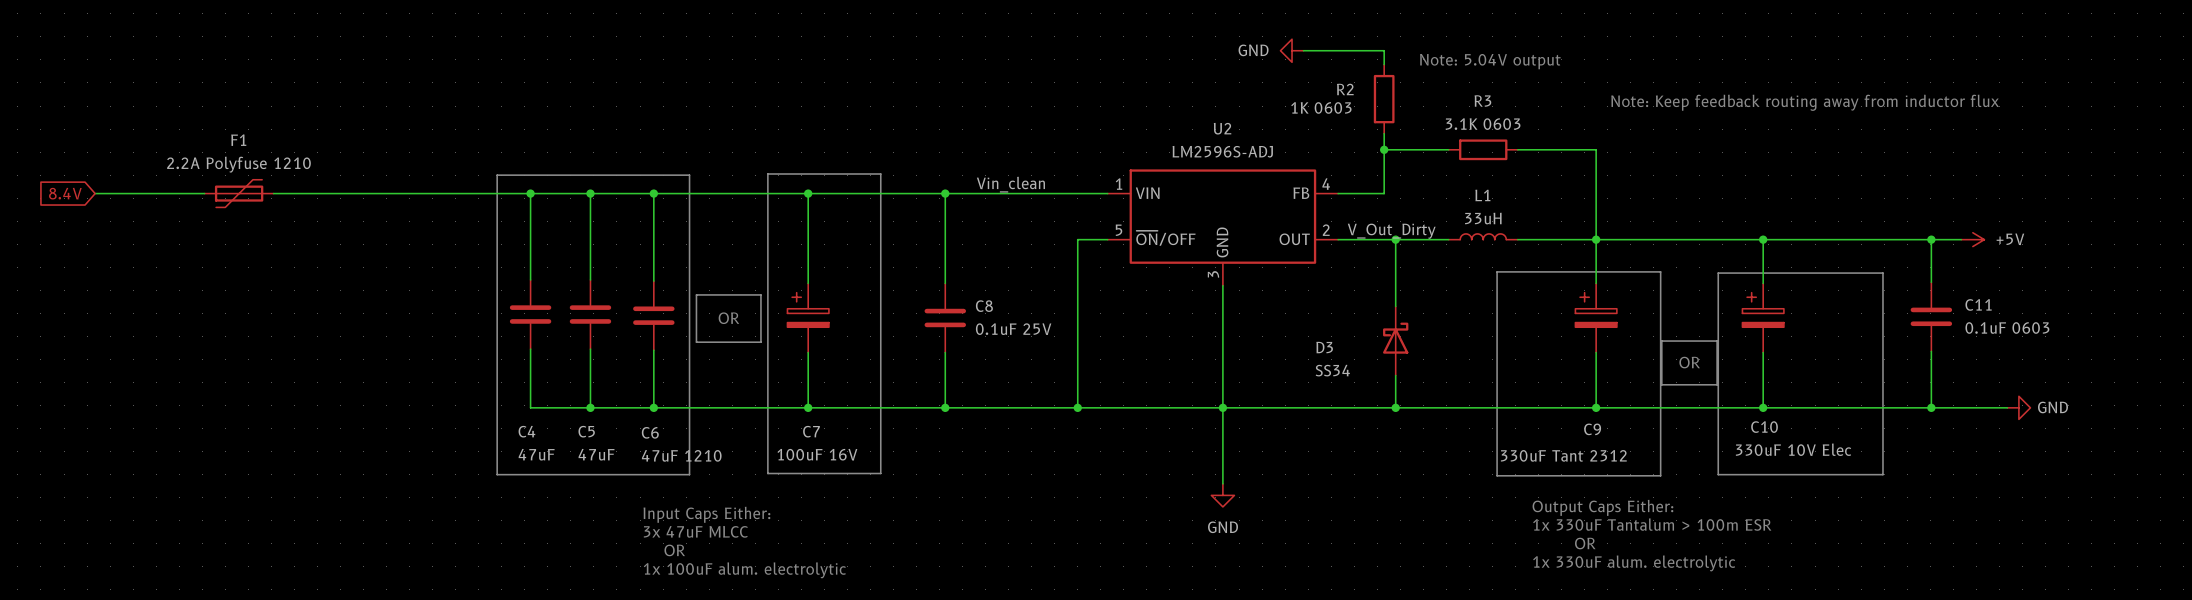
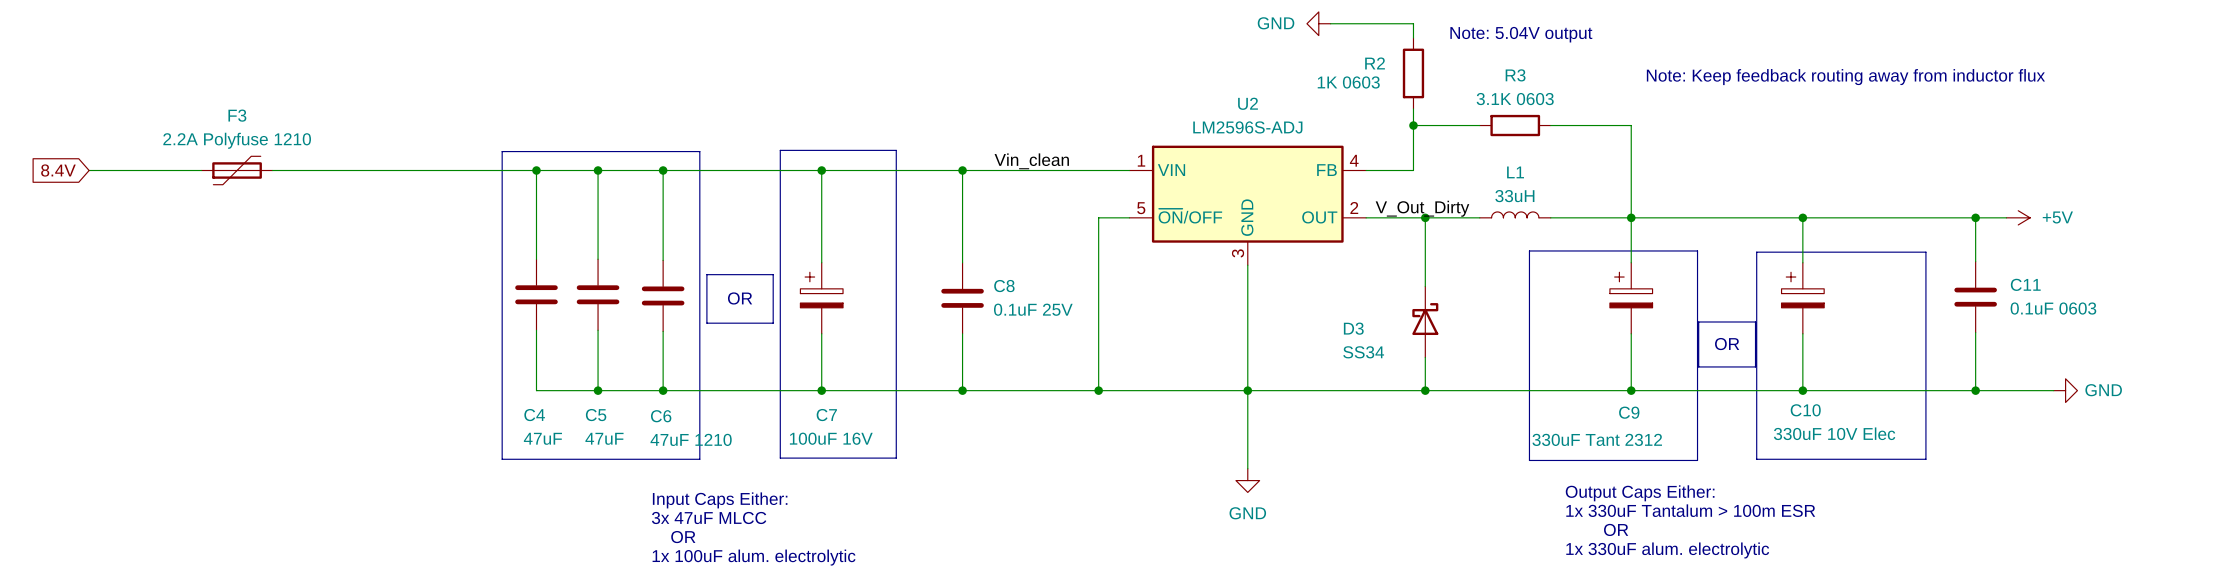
F1 name: F1 (238, 140) -> F3 (237, 115)

